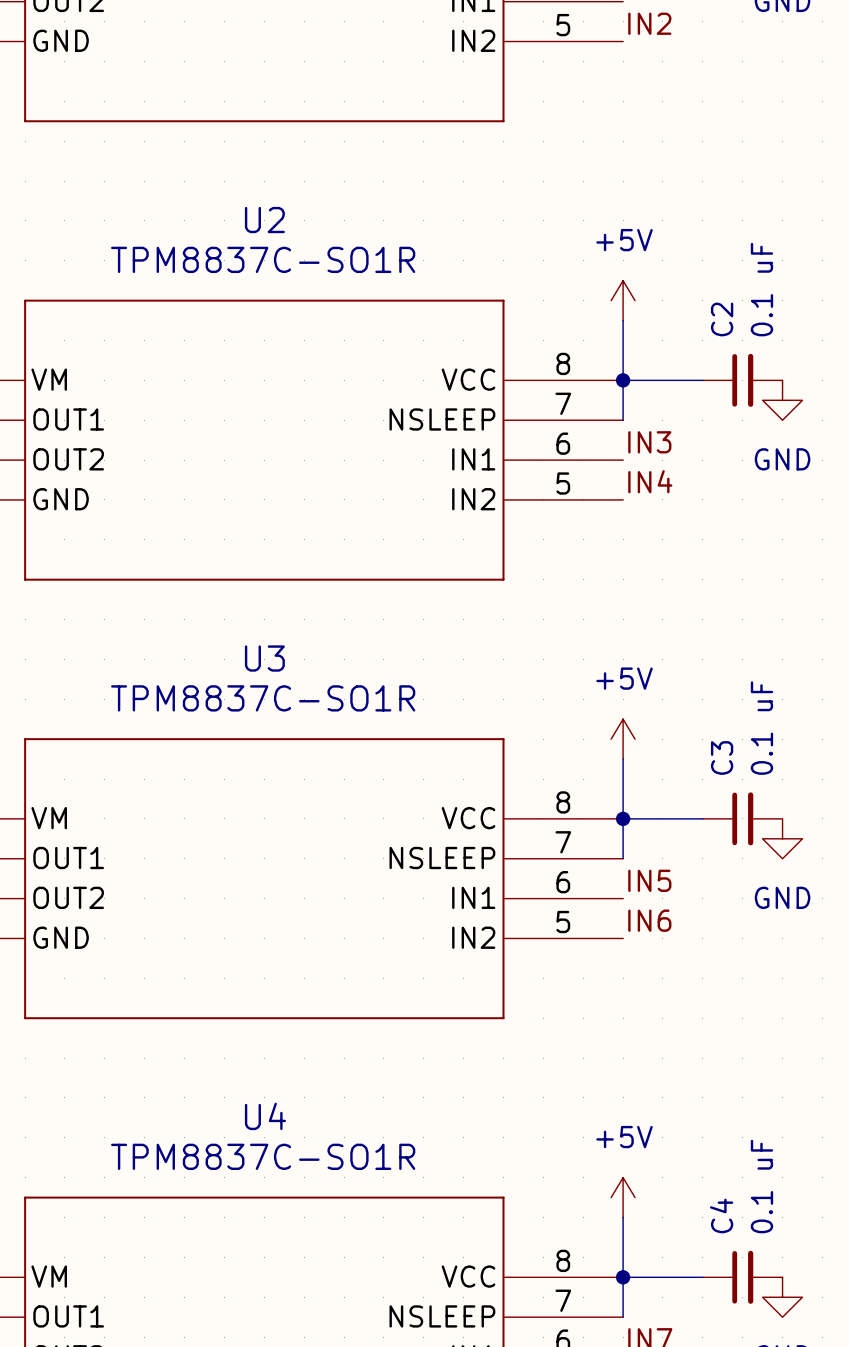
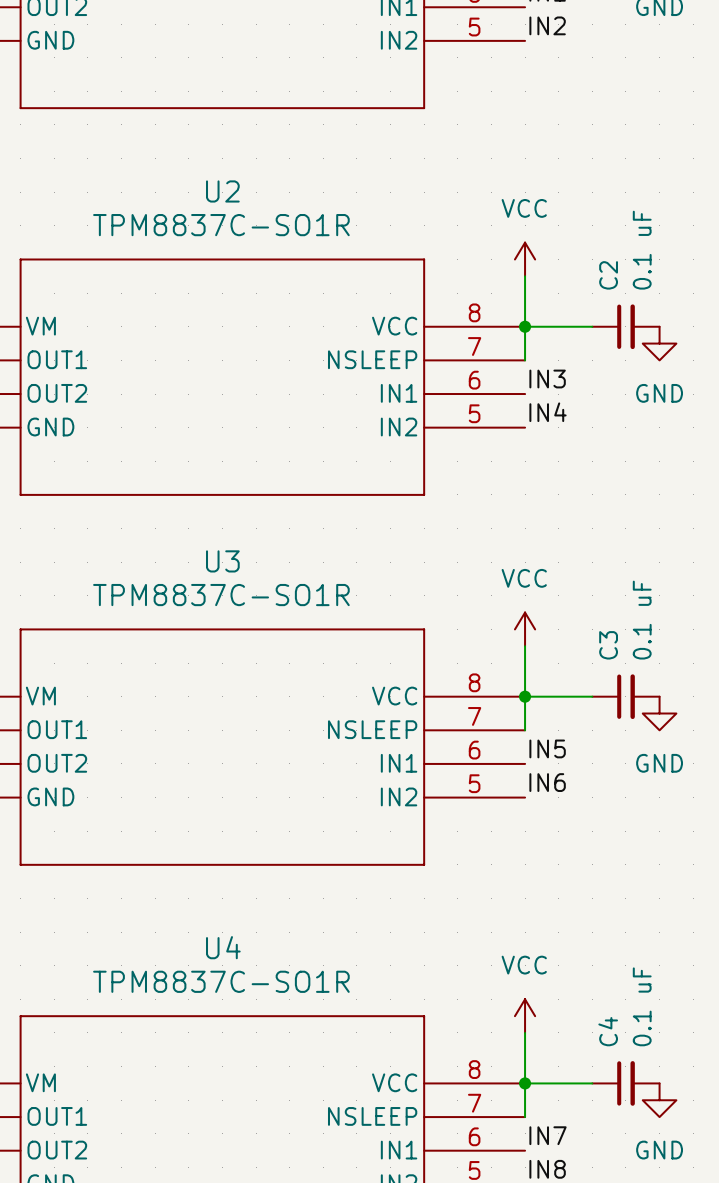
power symbol: +5V (623, 300) -> VCC (525, 259)
power symbol: +5V (623, 739) -> VCC (525, 629)
power symbol: +5V (623, 1197) -> VCC (525, 1016)

